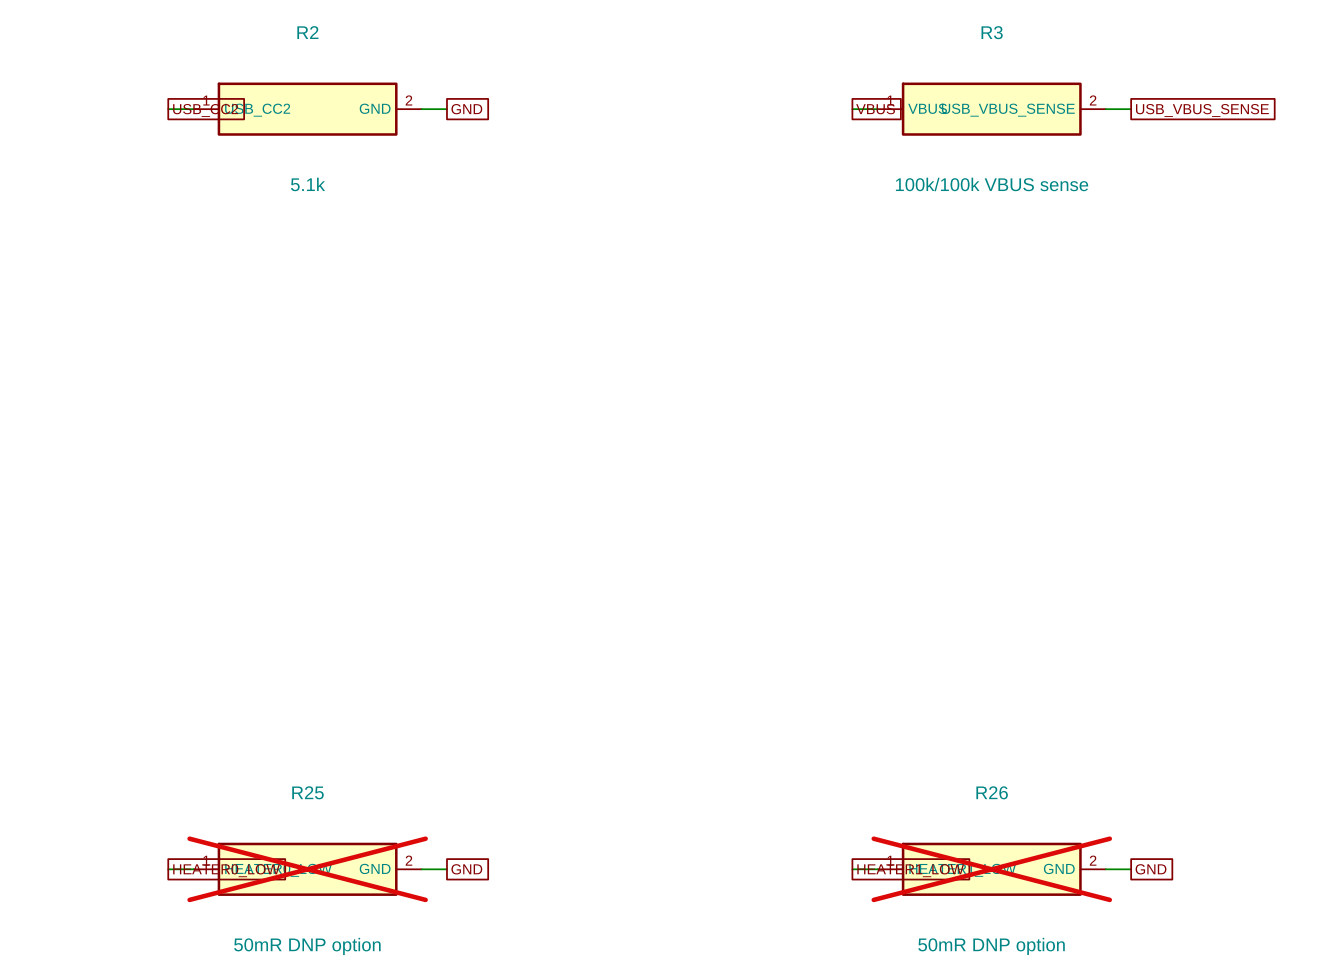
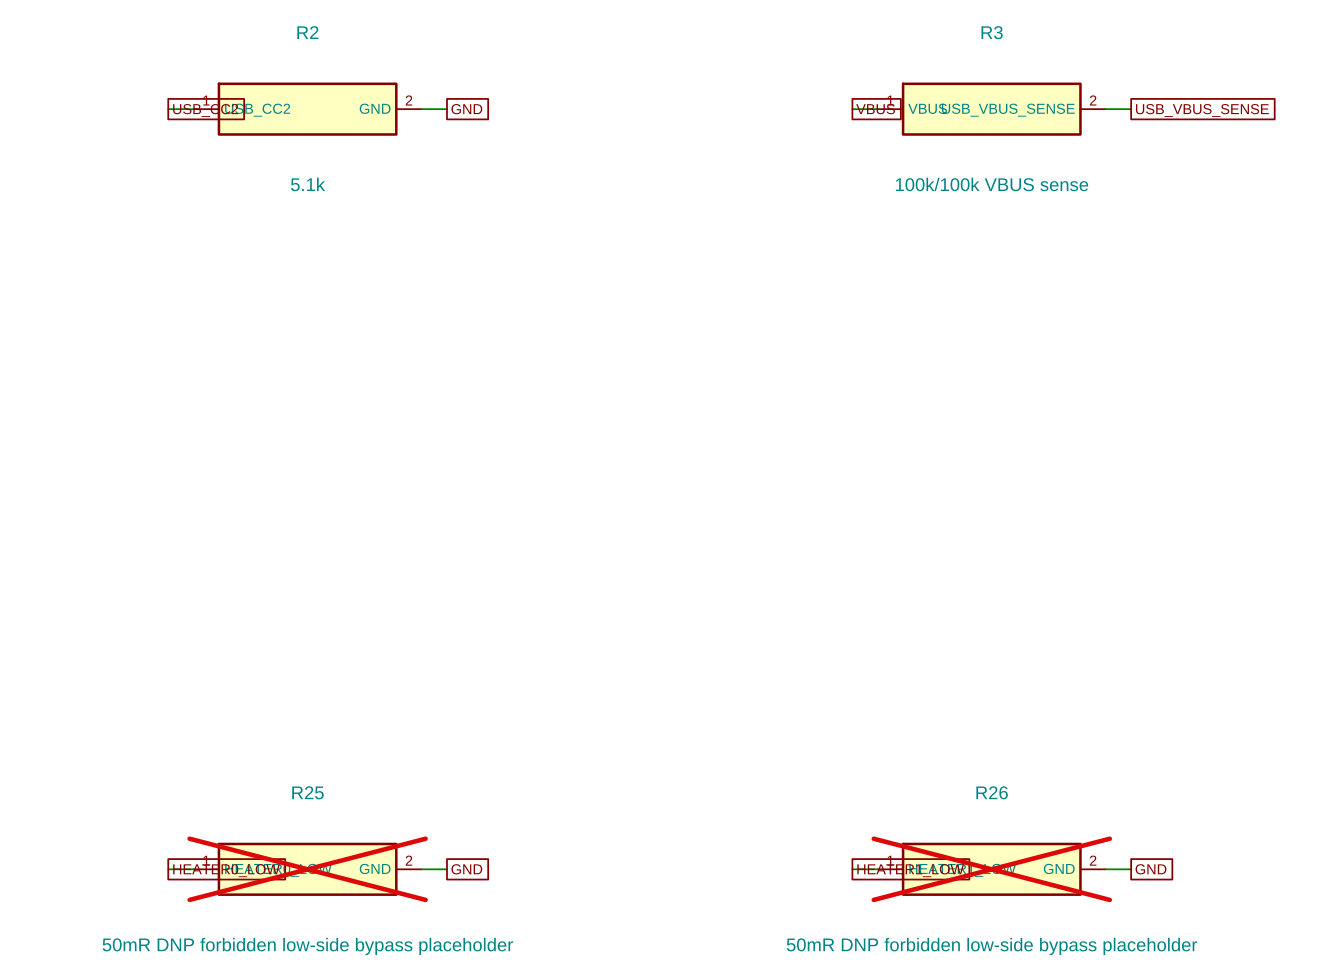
R25 value: 50mR DNP option (307, 946) -> 50mR DNP forbidden low-side bypass placeholder (307, 946)
R26 value: 50mR DNP option (991, 946) -> 50mR DNP forbidden low-side bypass placeholder (991, 946)

